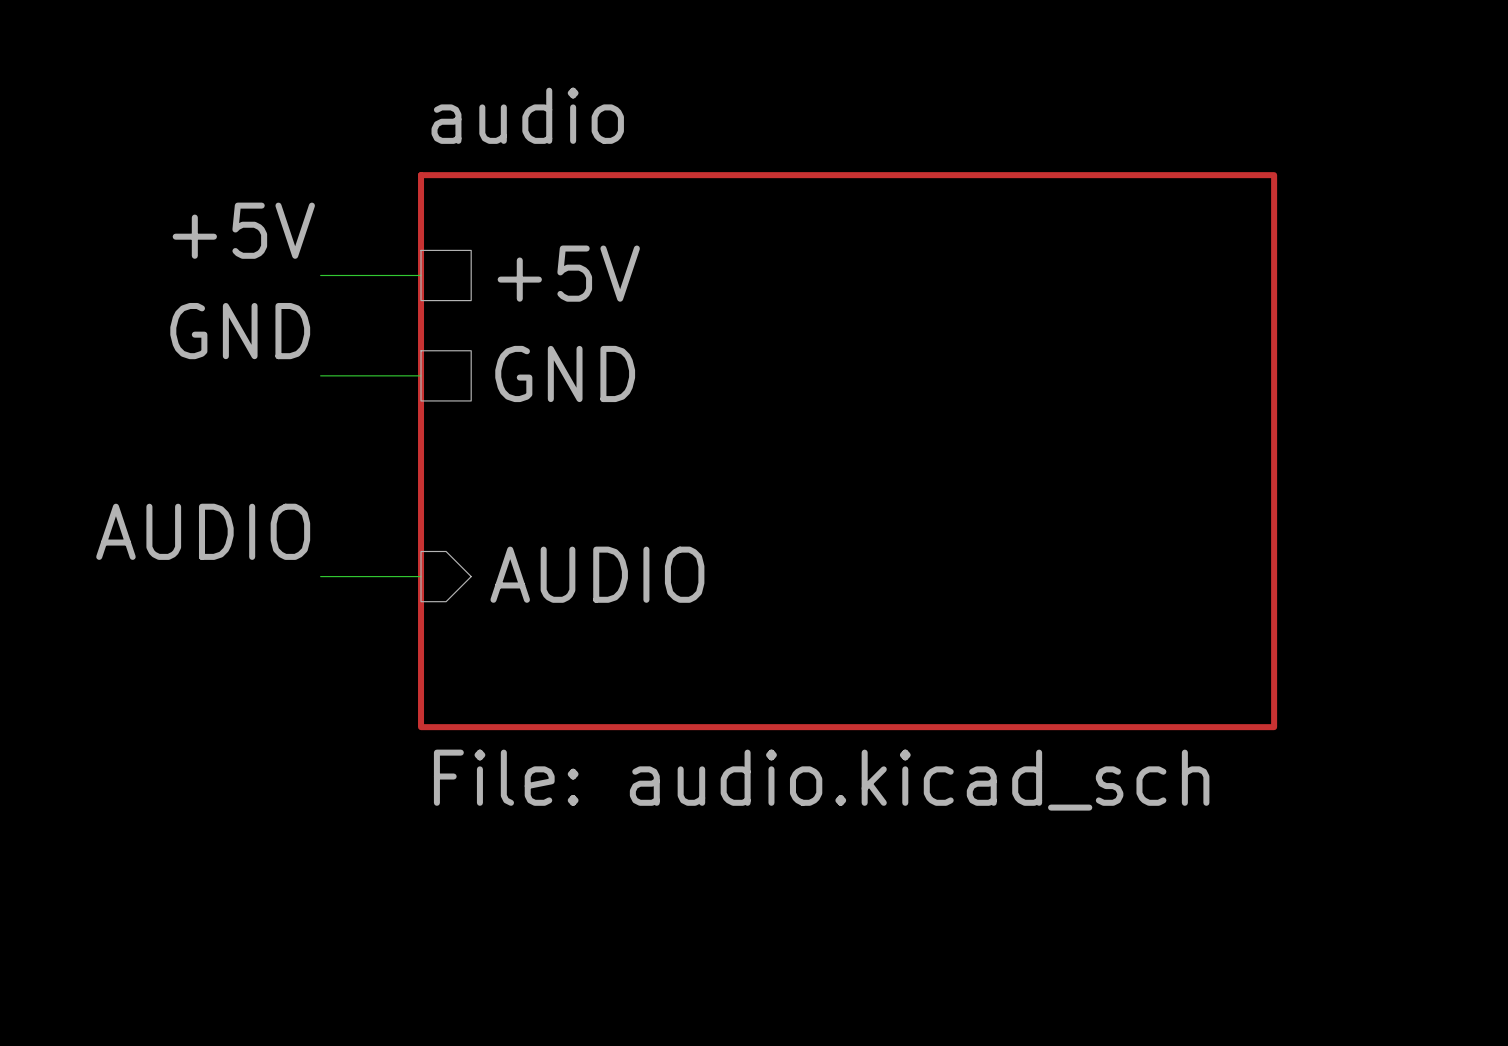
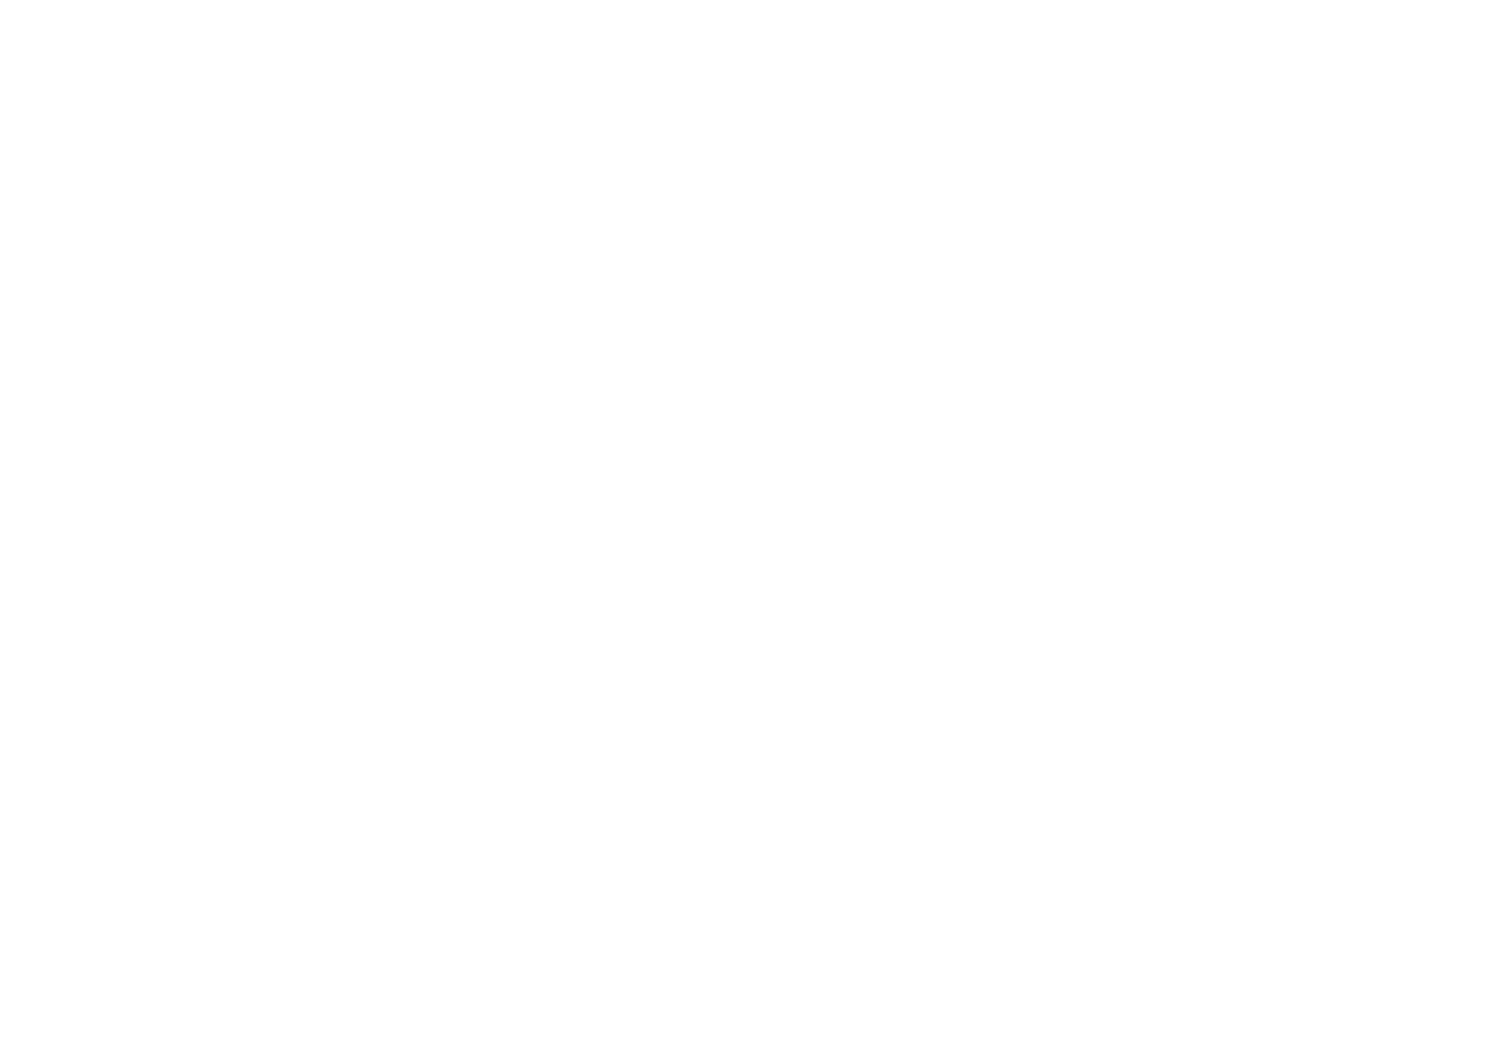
label: +5V (243, 230) -> none
sheet pin: +5V (568, 273) -> none
wire: (320, 275) (421, 275) -> none
label: GND (240, 331) -> none
sheet pin: GND (565, 373) -> none
wire: (320, 375) (421, 375) -> none
sheet audio: File: audio.kicad_sch (847, 451) -> none
label: AUDIO (203, 531) -> none
sheet pin: AUDIO (597, 574) -> none
wire: (320, 576) (421, 576) -> none

